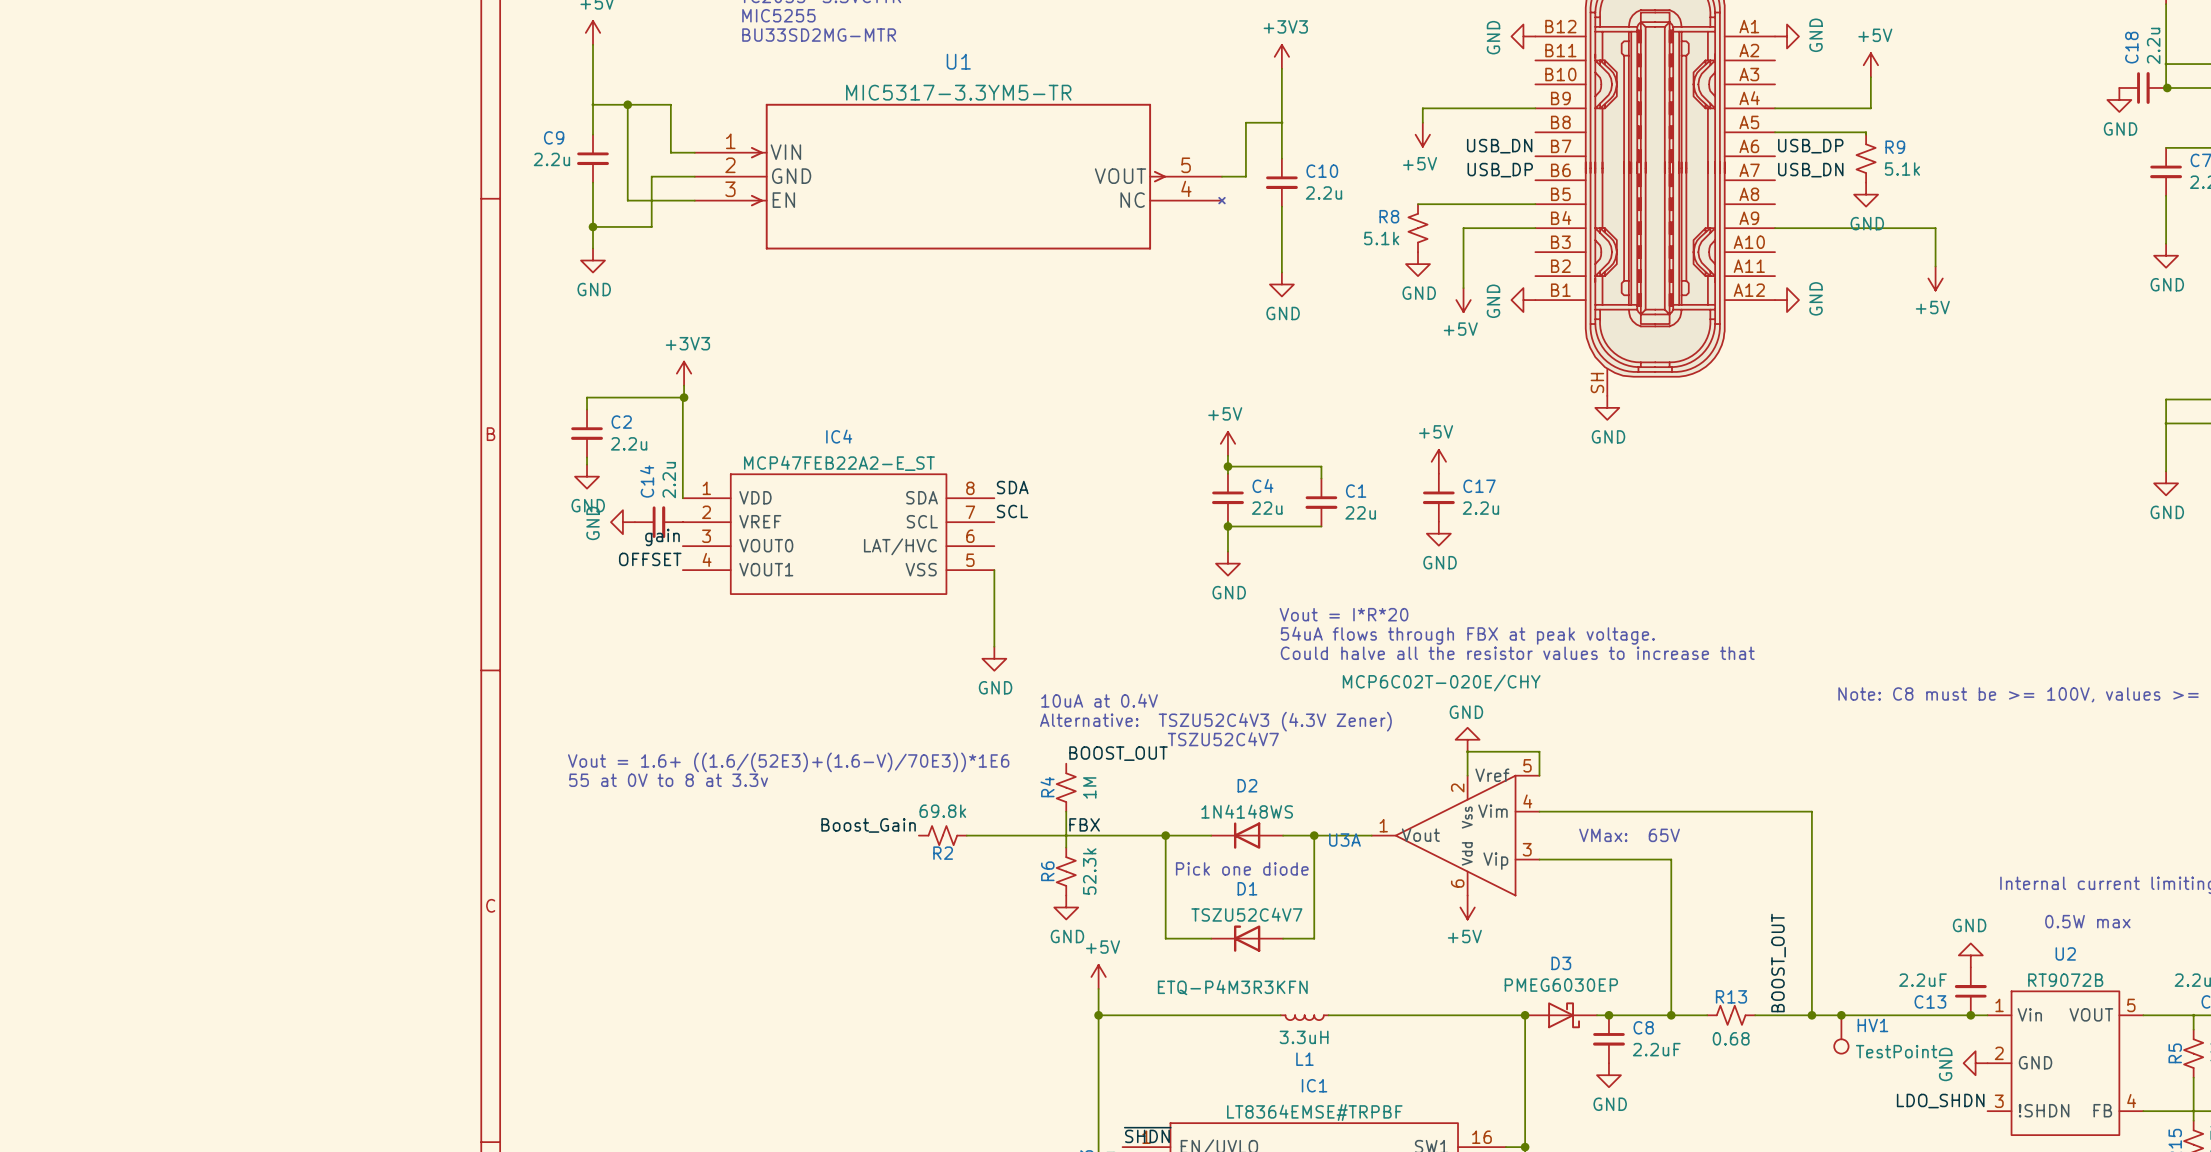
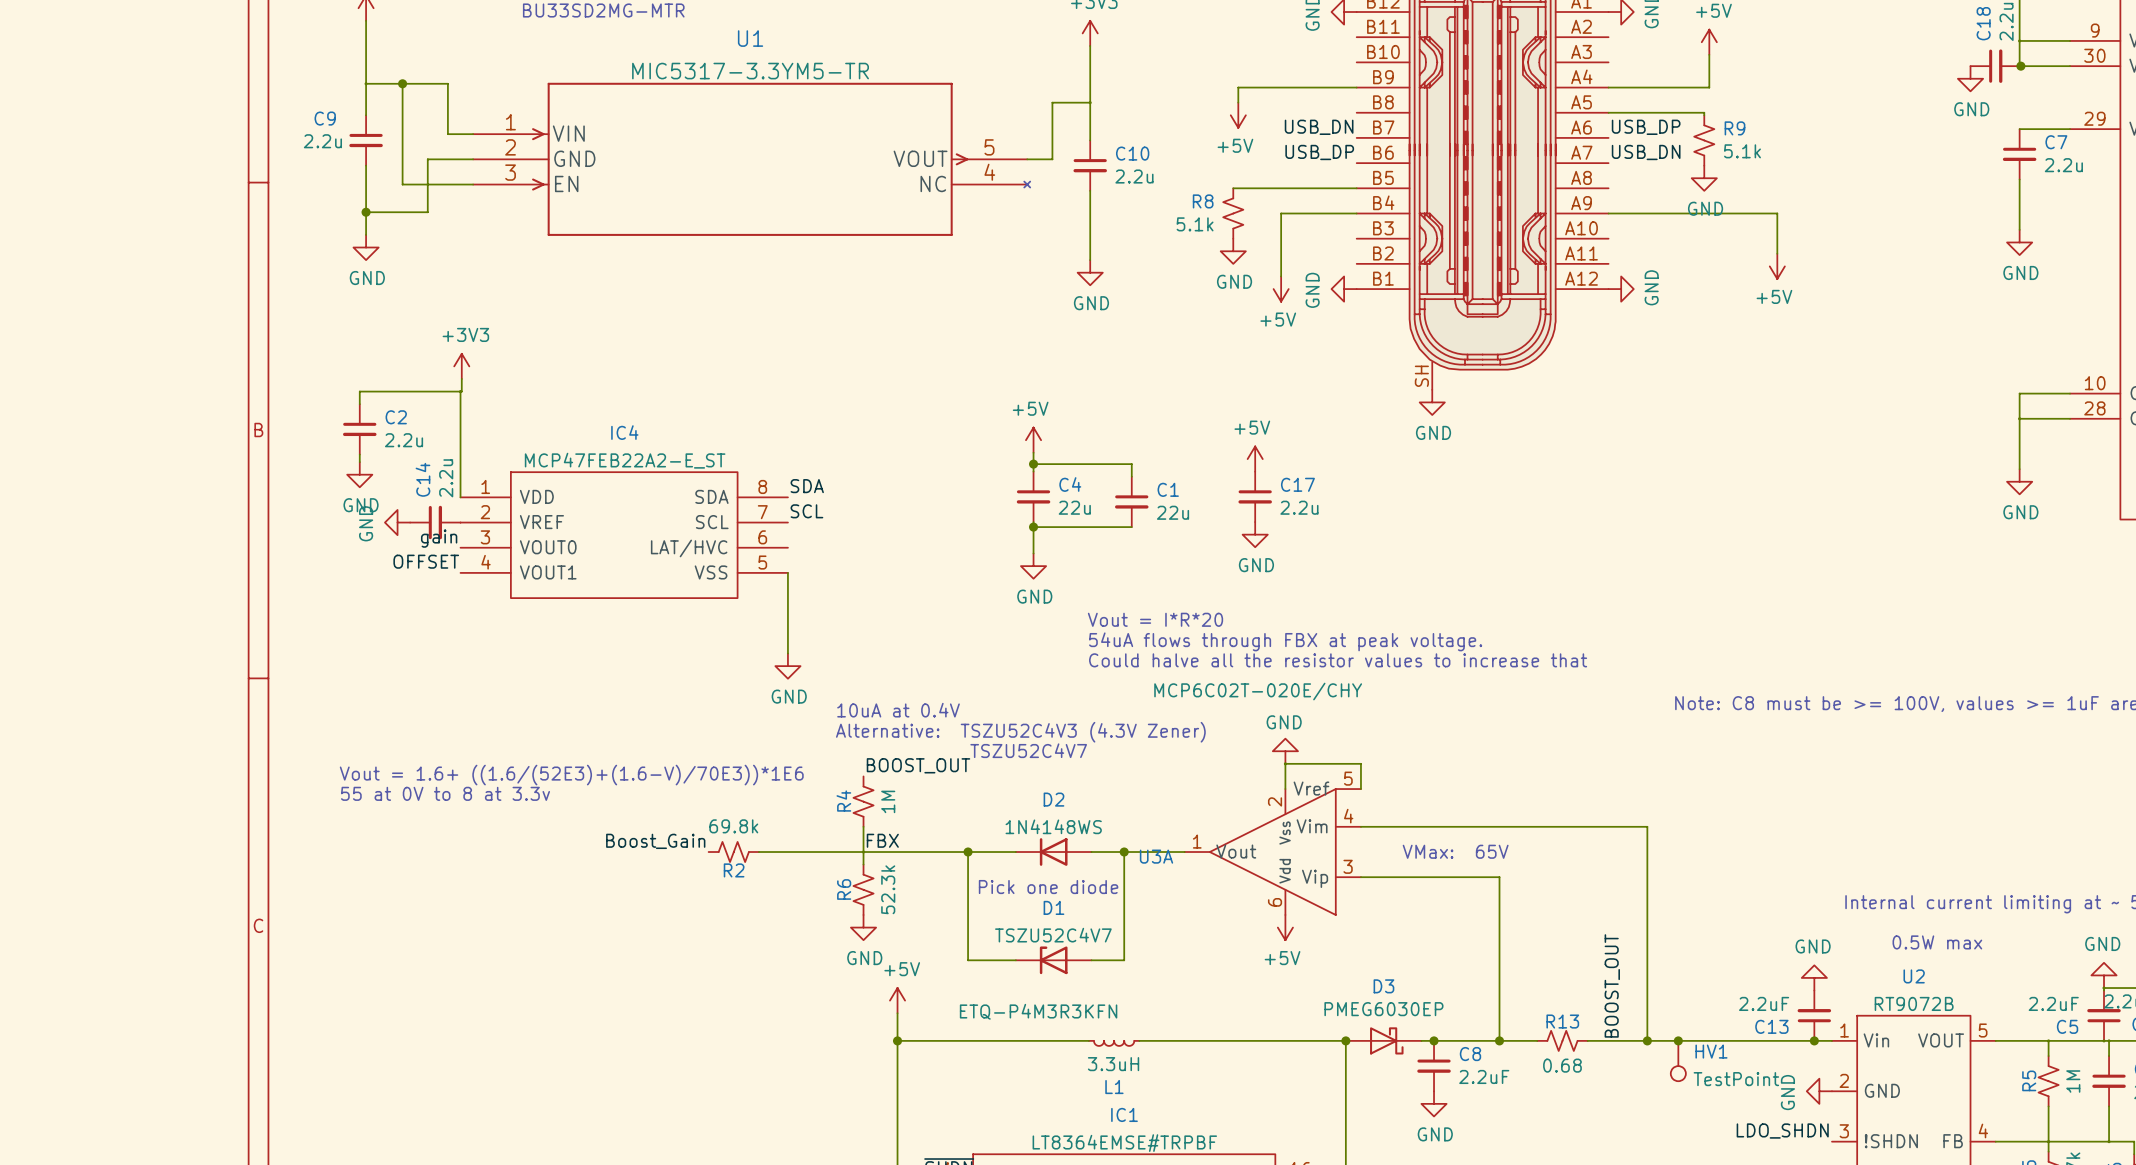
junction: (684, 397) -> none

